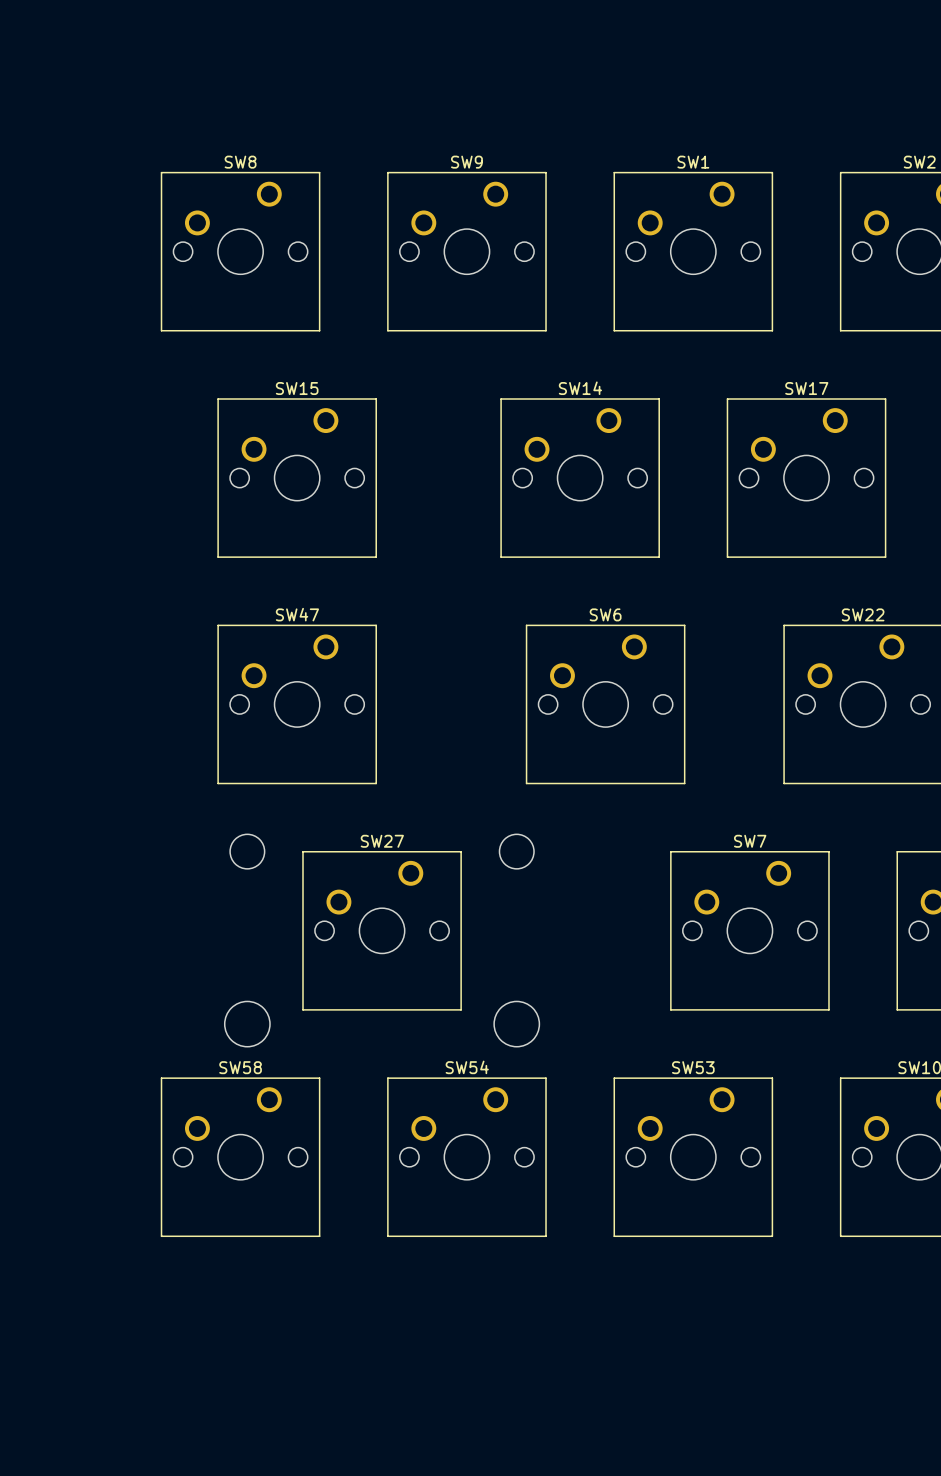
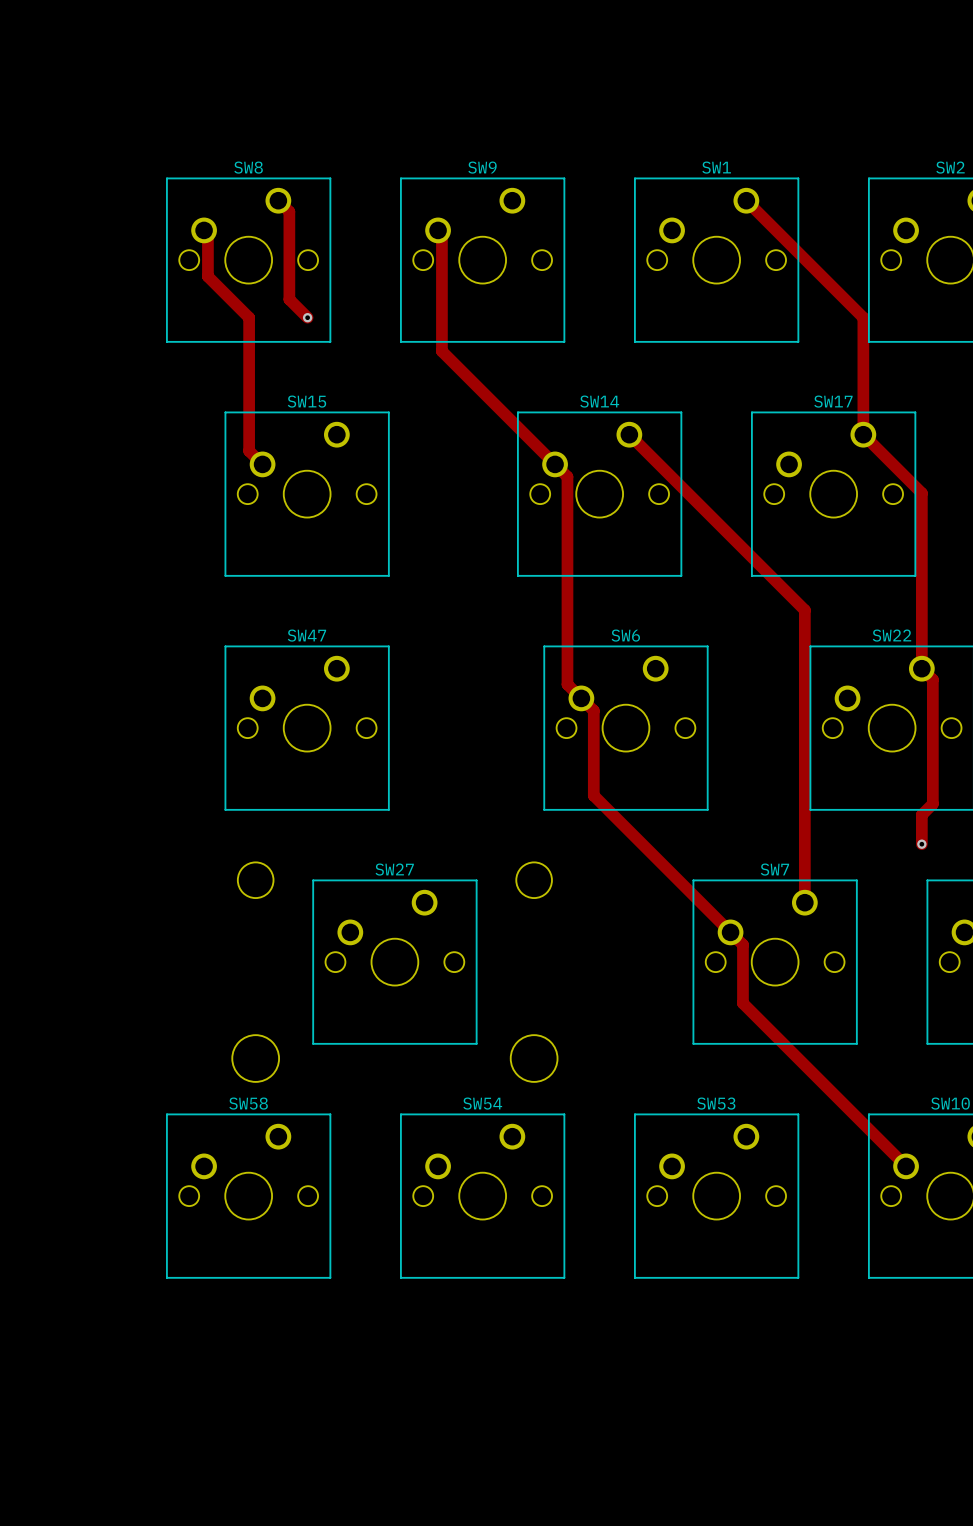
track: none -> (278, 200) (289, 211) (289, 299) (307, 317)
track: none -> (746, 200) (863, 317) (863, 434) (921, 493) (921, 668) (932, 679) (932, 803) (921, 814) (921, 844)
track: none -> (204, 230) (207, 234) (207, 276) (249, 317) (249, 450) (262, 464)
track: none -> (438, 230) (441, 234) (441, 351) (554, 463)
via: none -> (307, 317)
track: none -> (629, 434) (804, 610) (804, 902)
track: none -> (555, 464) (567, 476) (567, 684) (593, 710) (593, 795) (742, 944) (742, 1003) (906, 1166)
via: none -> (921, 844)

